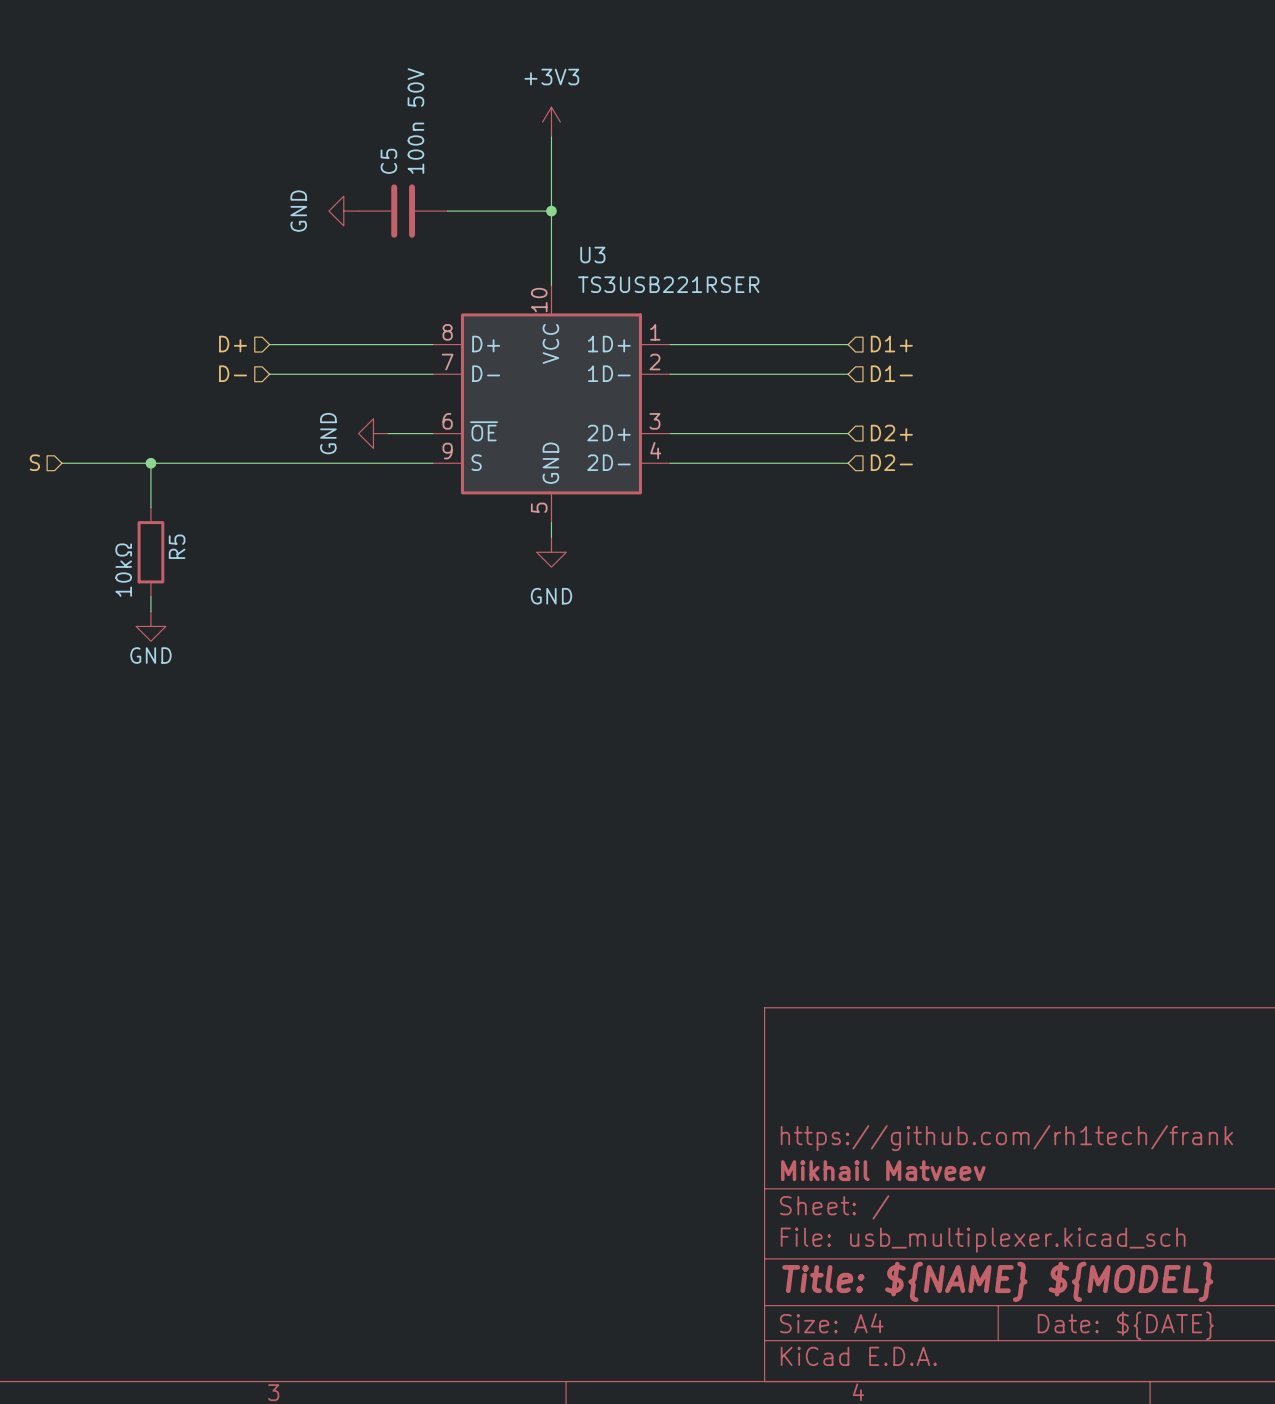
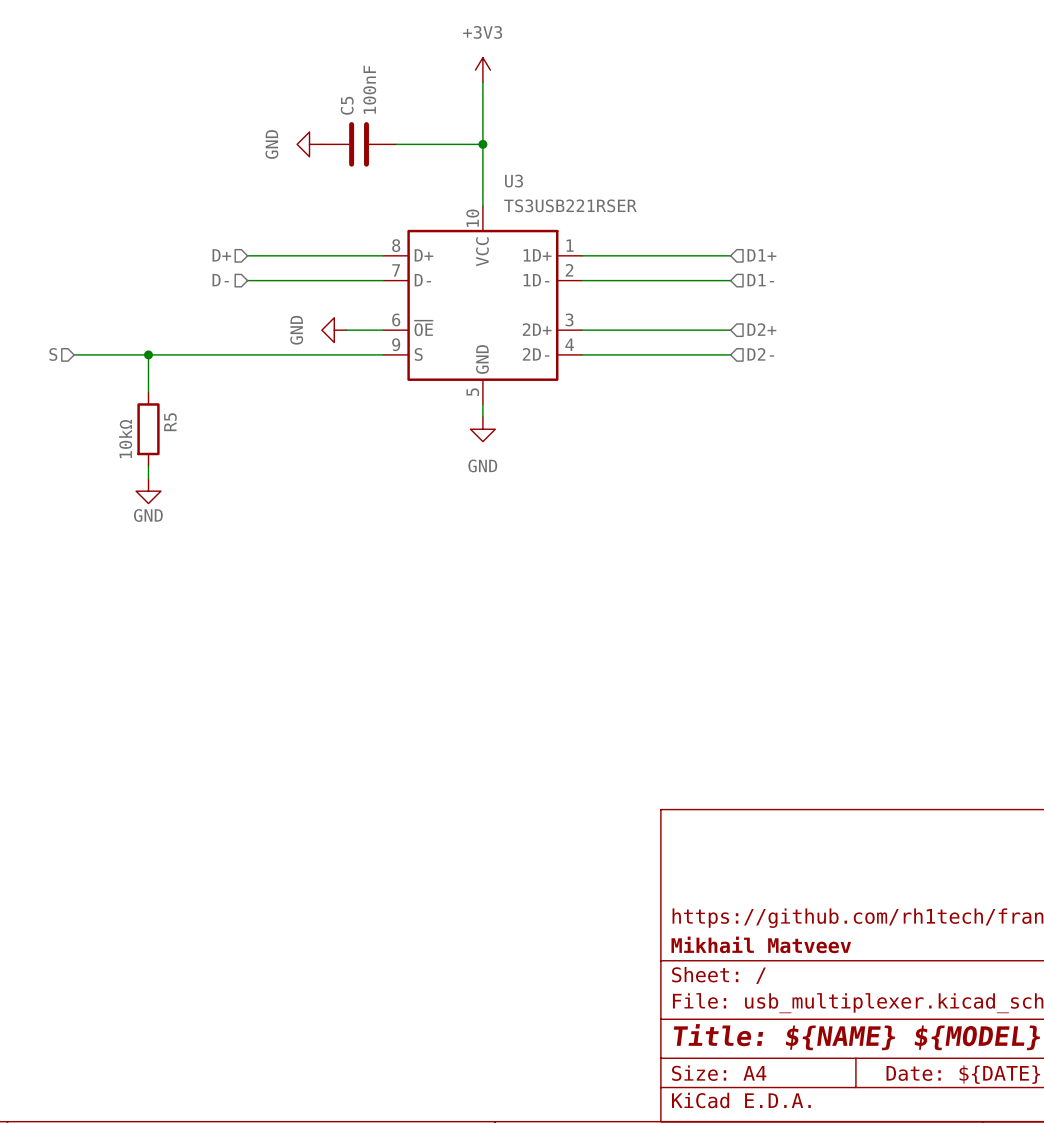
C5 value: 100n 50V (415, 121) -> 100nF (369, 89)

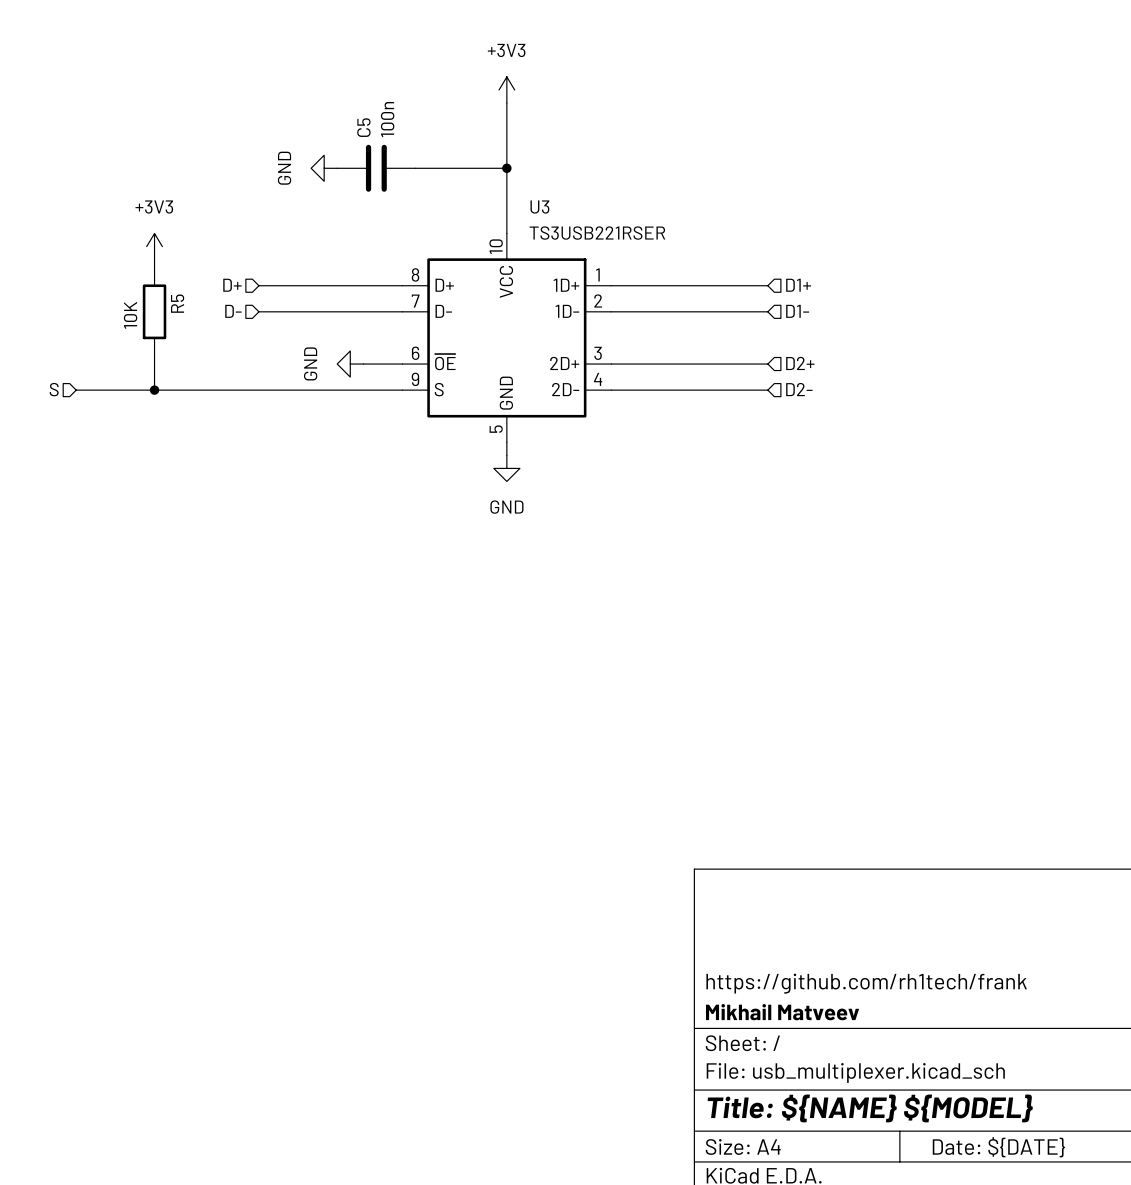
C5 value: 100nF (369, 89) -> 100n (387, 119)
power symbol: none -> +3V3 (154, 246)
wire: (148, 354) (148, 392) -> (154, 390) (154, 350)
R5 position: (148, 429) -> (154, 311)
R5 value: 10kΩ (125, 439) -> 10K (130, 315)
wire: (148, 466) (148, 478) -> (154, 259) (154, 272)
power symbol: GND (148, 491) -> none

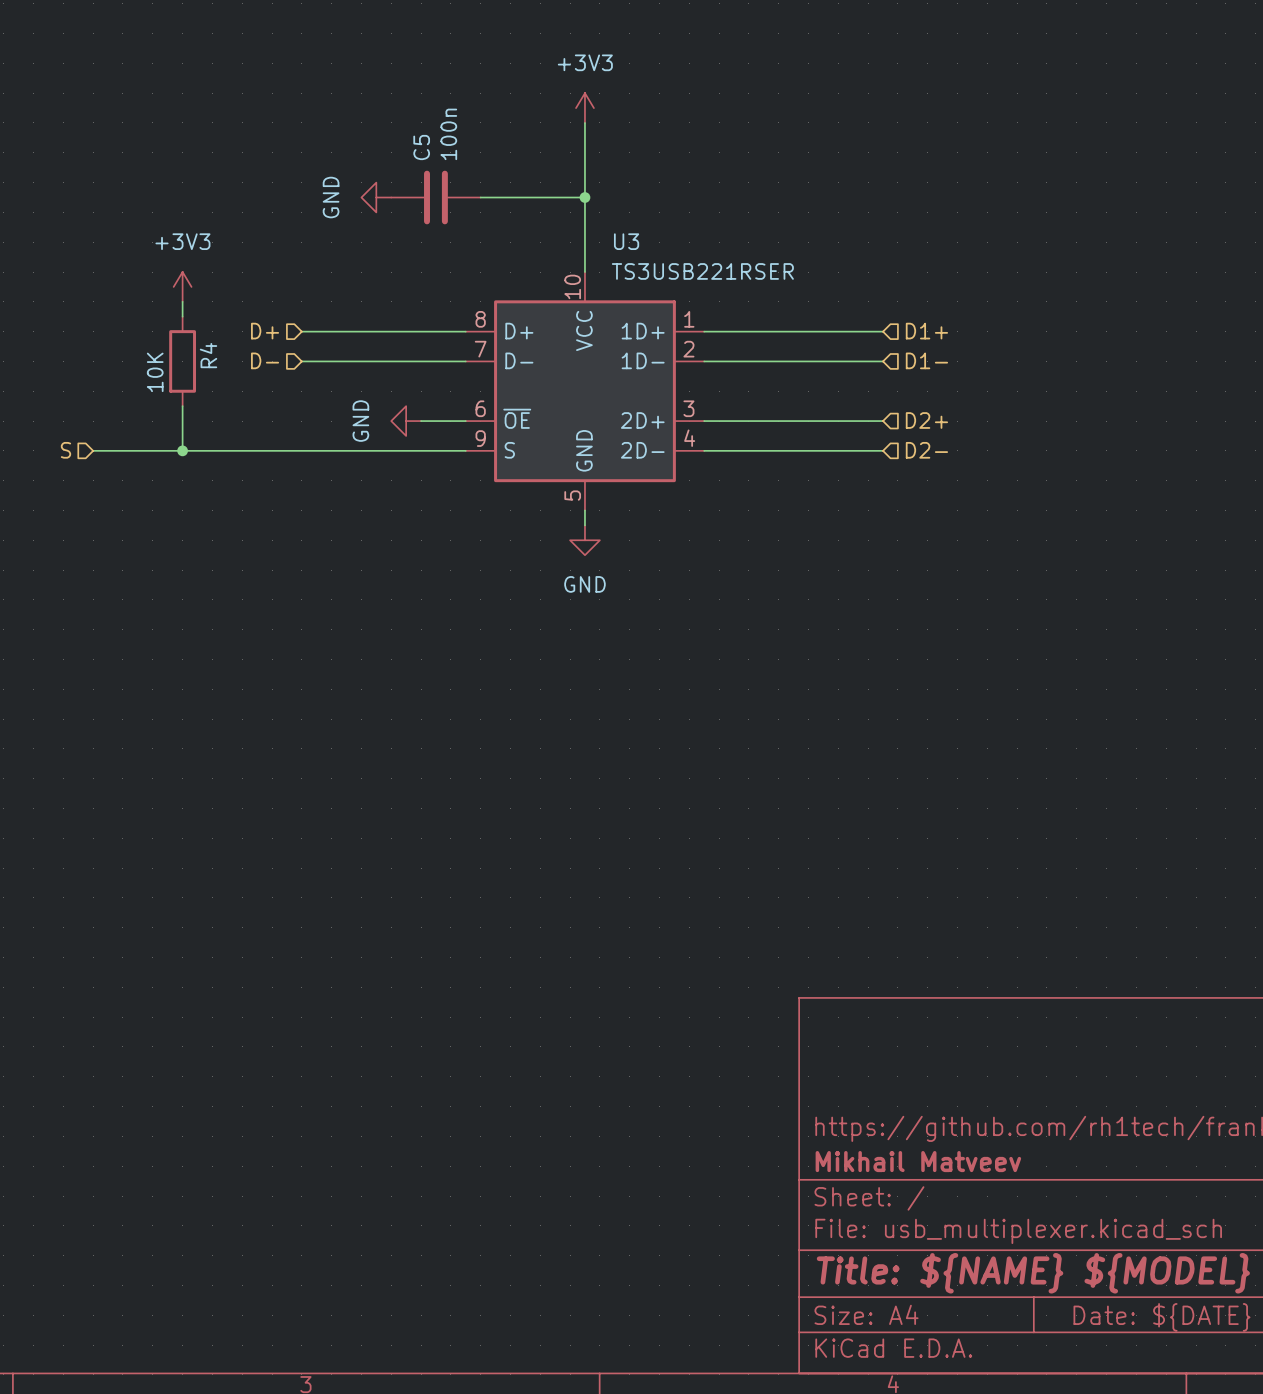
R5 name: R5 (177, 303) -> R4 (208, 355)

